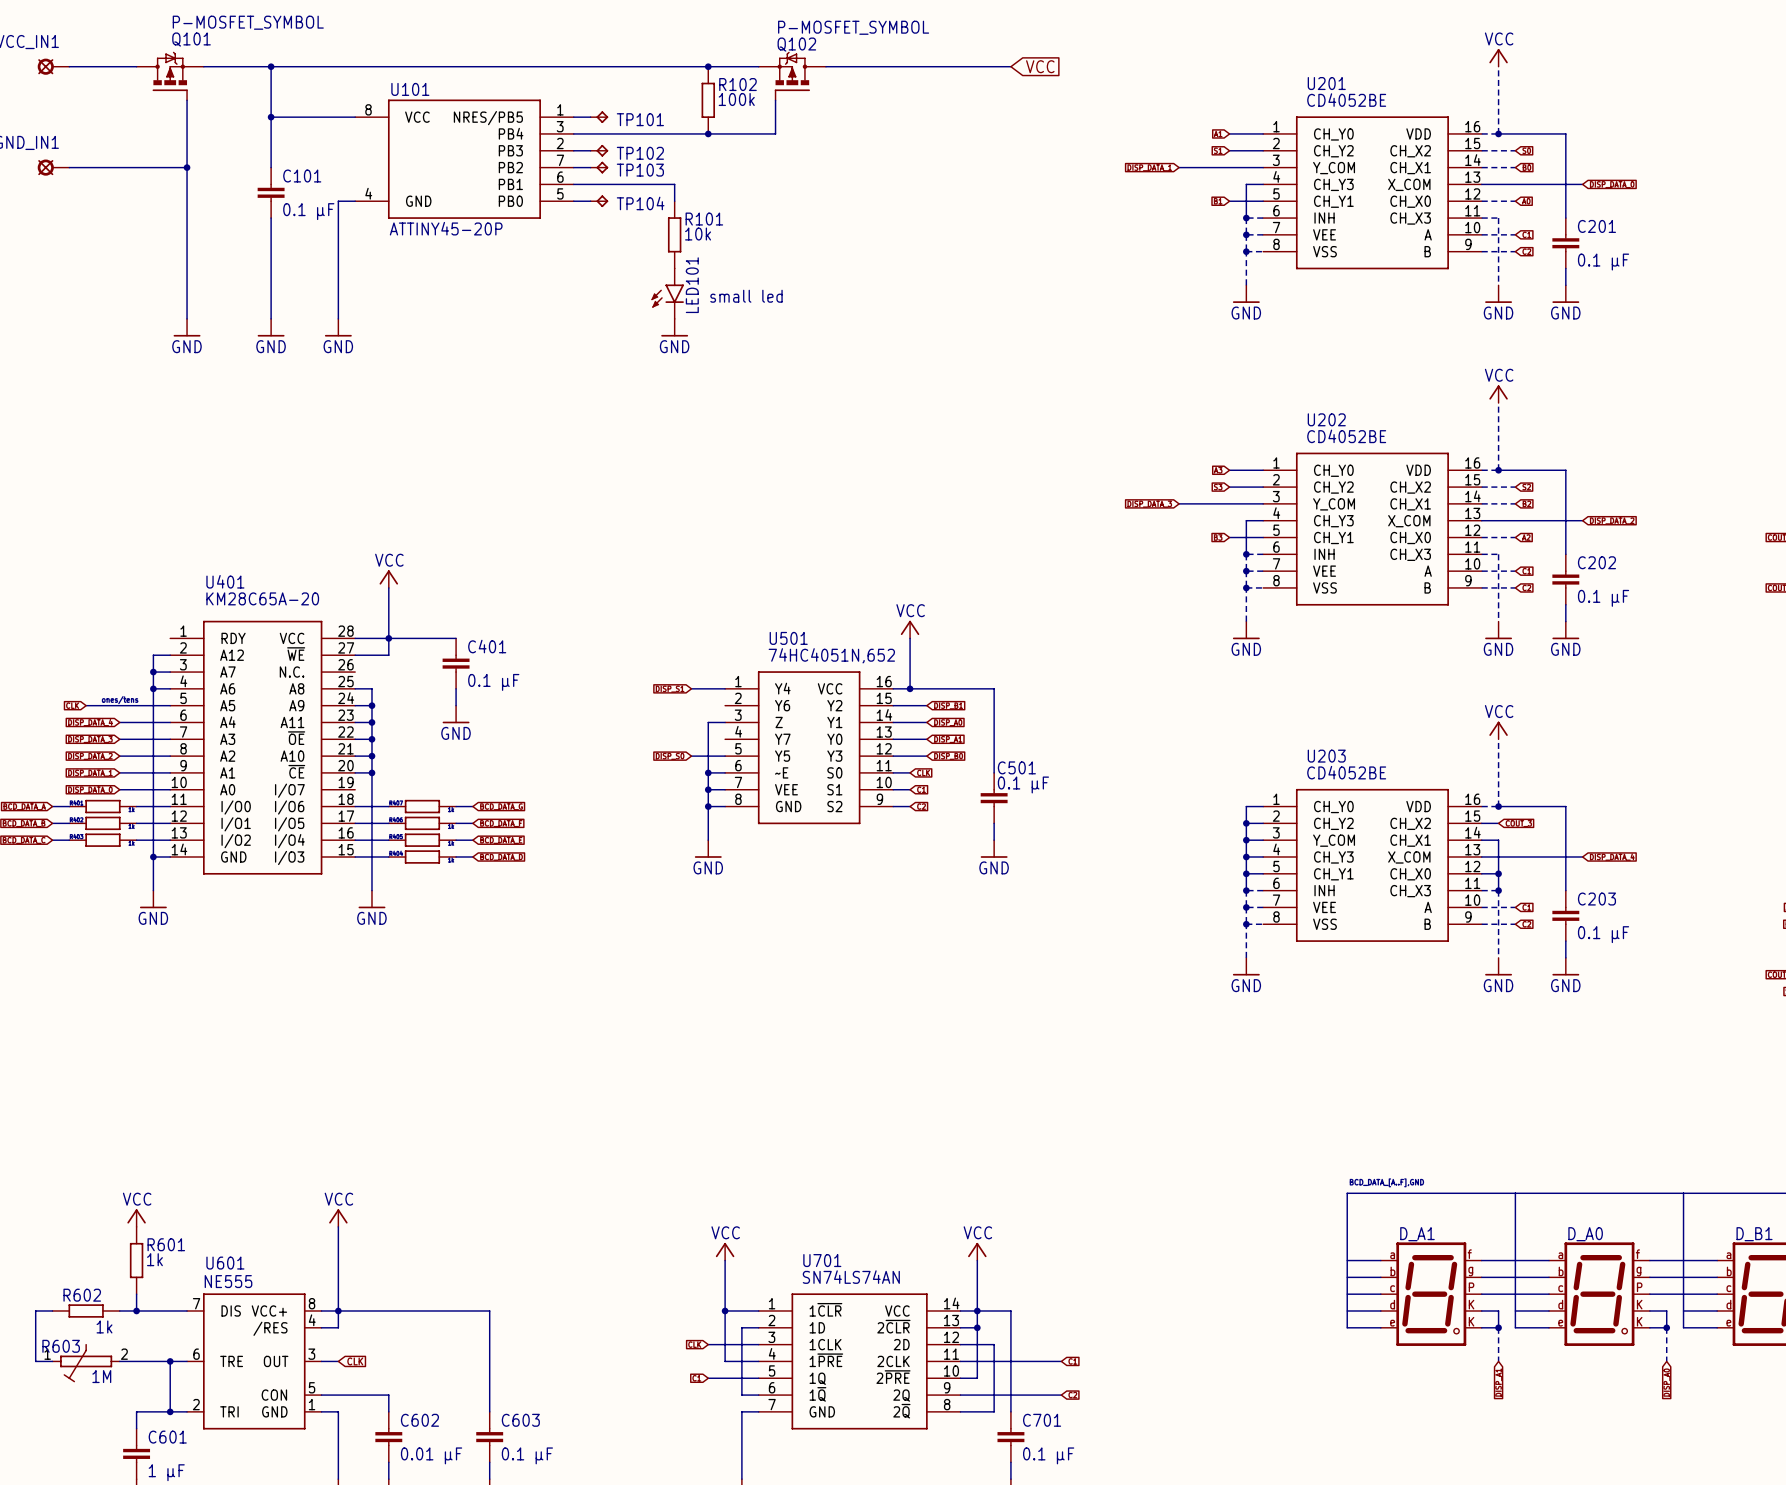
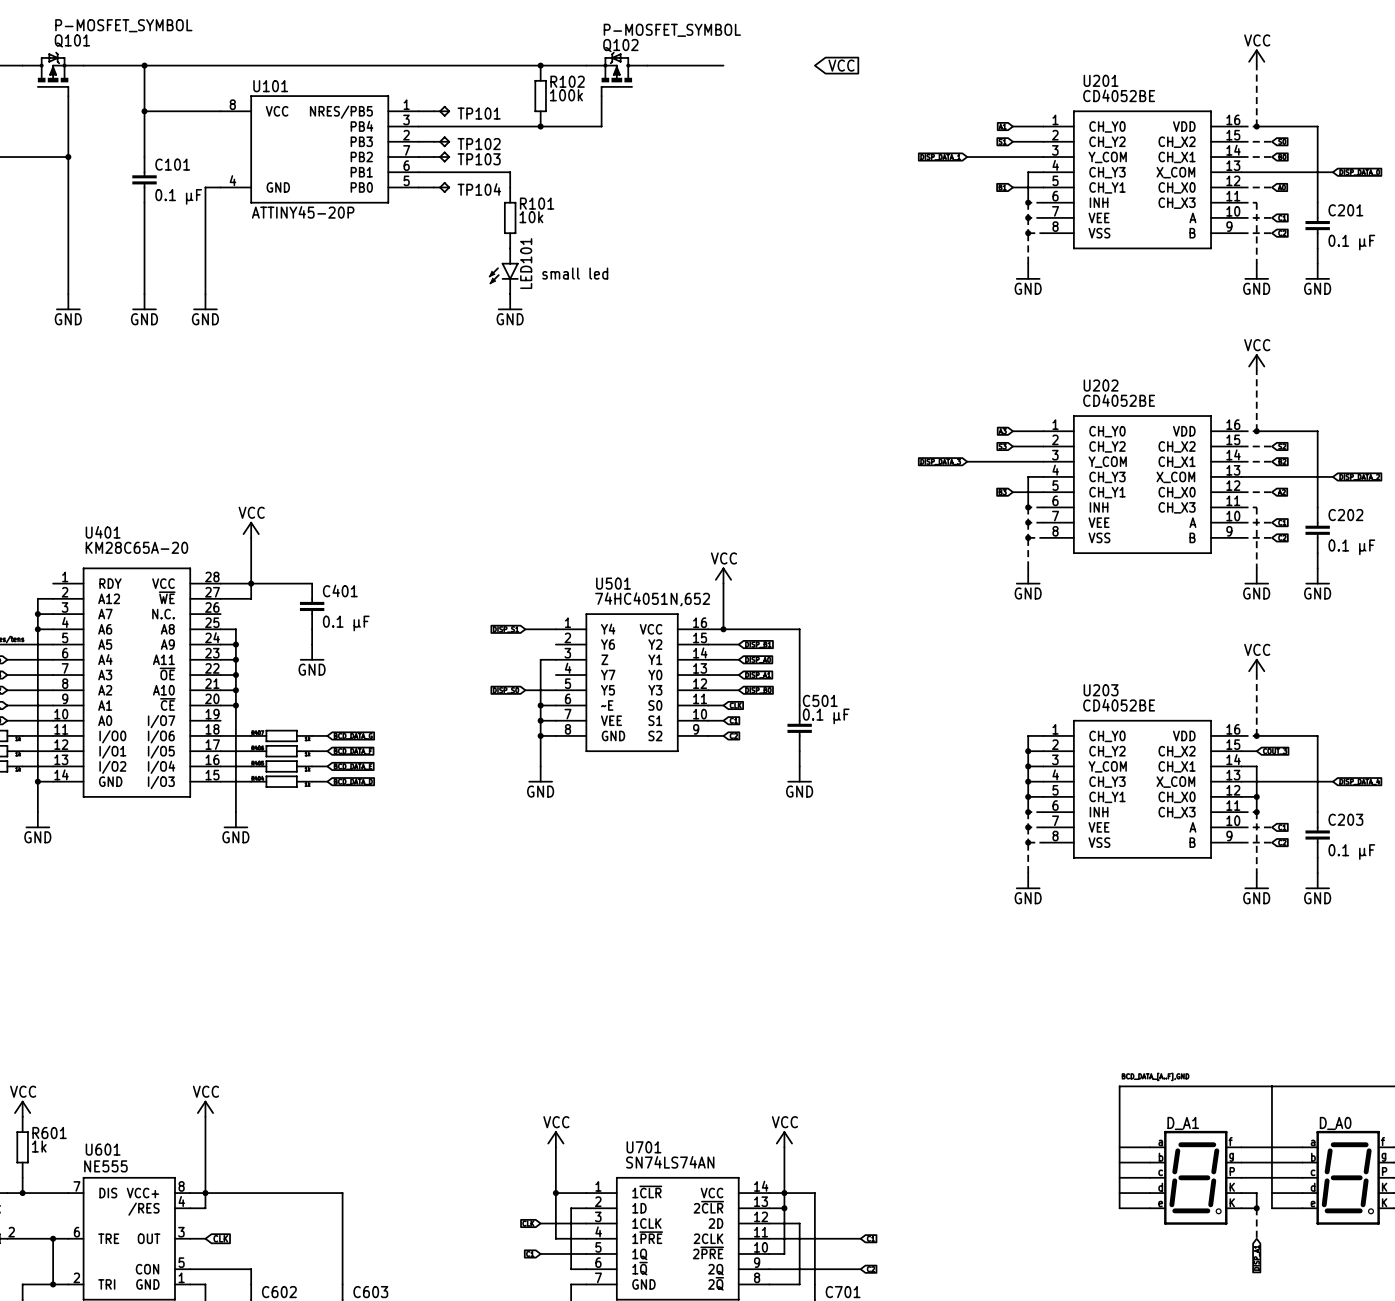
wire: (910, 66) (1010, 66) -> none

